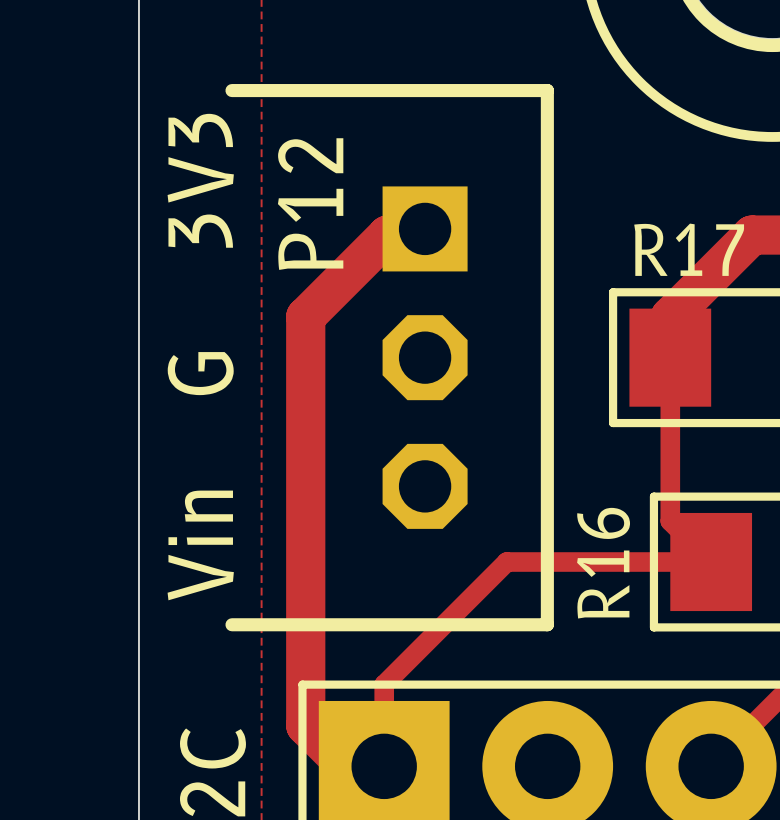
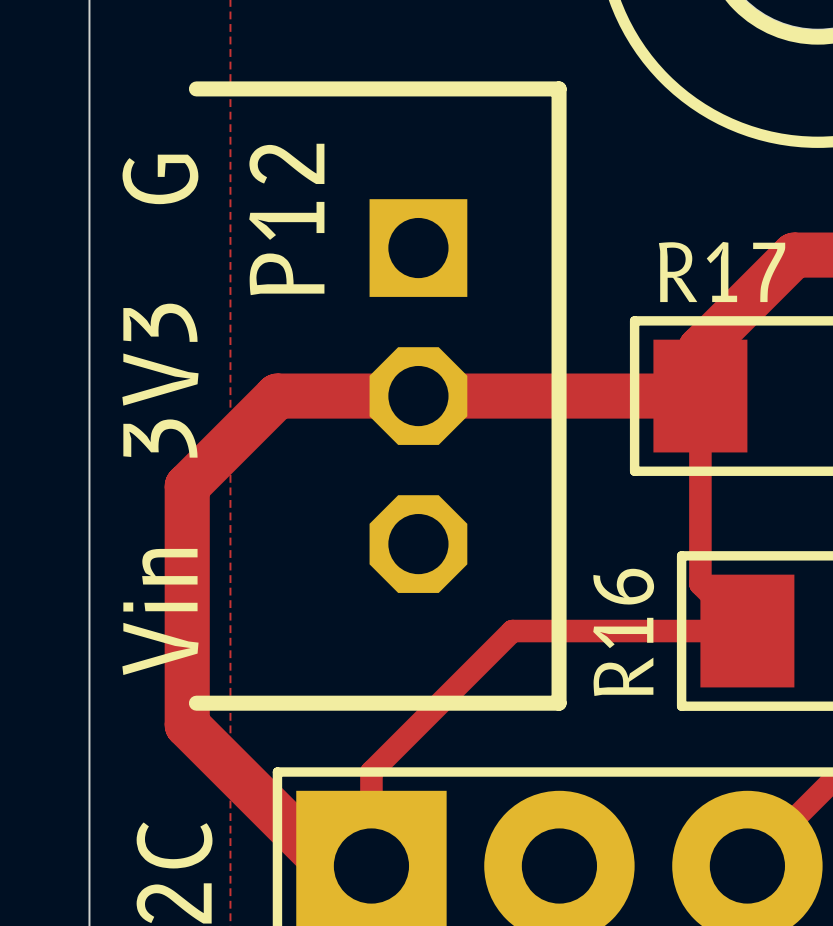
text position: 3V3 (200, 180) -> 3V3 (160, 380)
track: (425, 228) (418, 235) (387, 235) (305, 316) (305, 725) -> (700, 396) (277, 396) (187, 486) (187, 725) (281, 819)
text position: G (200, 373) -> G (160, 179)

